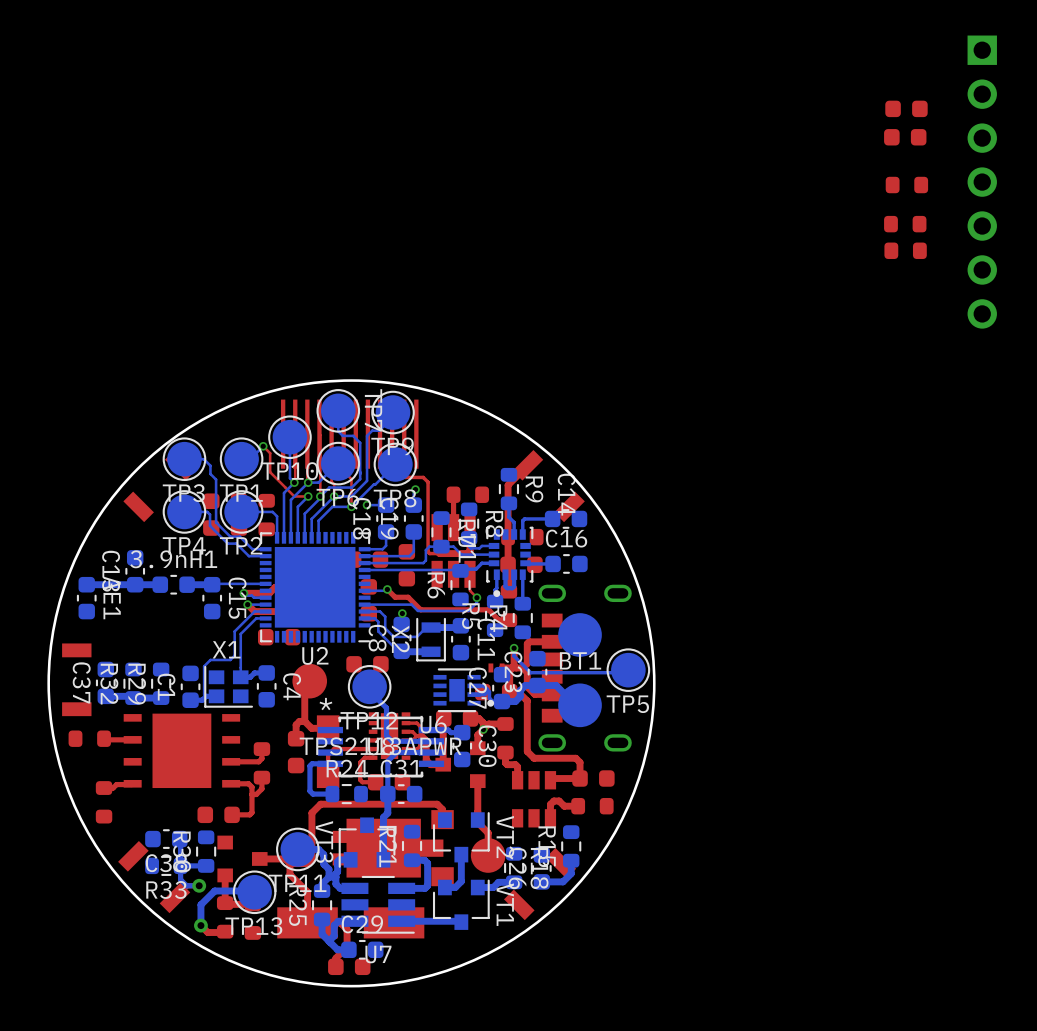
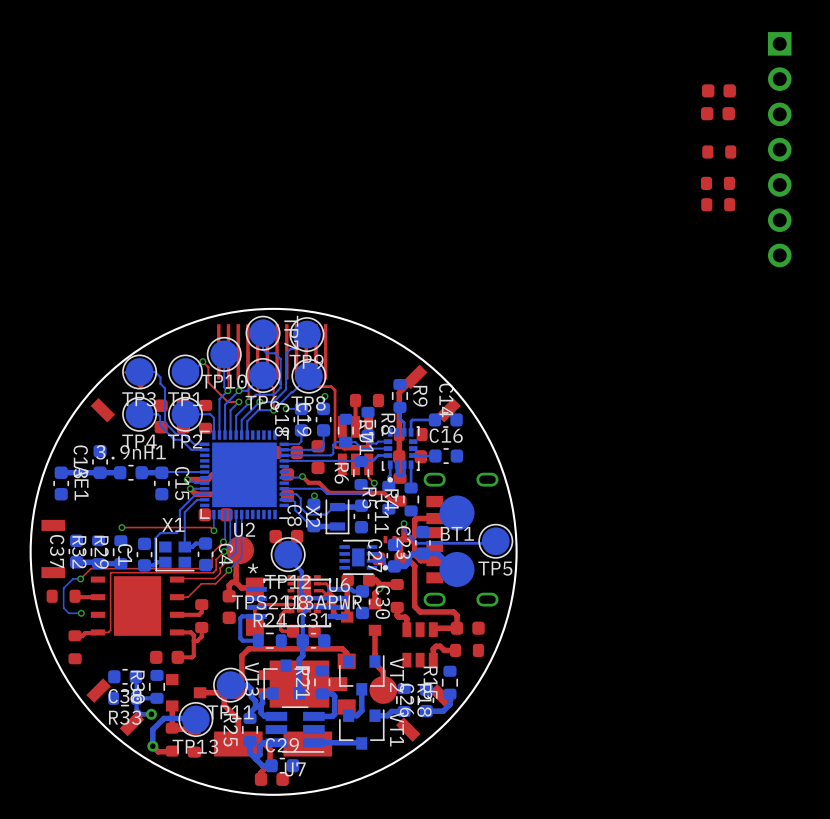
bottom track: none -> (213, 514) (213, 530)
bottom track: none -> (225, 514) (225, 540) (223, 541)
bottom track: none -> (230, 514) (230, 545) (224, 551)
bottom track: none -> (236, 514) (236, 552) (227, 560)
bottom track: none -> (241, 514) (241, 557) (228, 570)
top track: none -> (121, 527) (210, 527) (213, 530)
via: none -> (121, 527)
via: none -> (213, 530)
top track: none -> (223, 541) (212, 553) (212, 566) (210, 568) (90, 568) (80, 578)
via: none -> (223, 541)
top track: none -> (224, 551) (216, 559) (216, 569) (213, 572) (111, 572) (110, 630) (108, 632) (98, 632)
via: none -> (224, 551)
top track: none -> (227, 560) (220, 568) (220, 573) (214, 578) (177, 579)
via: none -> (227, 560)
top track: none -> (228, 570) (215, 583) (201, 583) (188, 597) (177, 597)
via: none -> (228, 570)
bottom track: none -> (80, 578) (73, 578) (63, 588) (63, 608) (68, 613) (81, 613)
via: none -> (80, 578)
via: none -> (81, 613)

